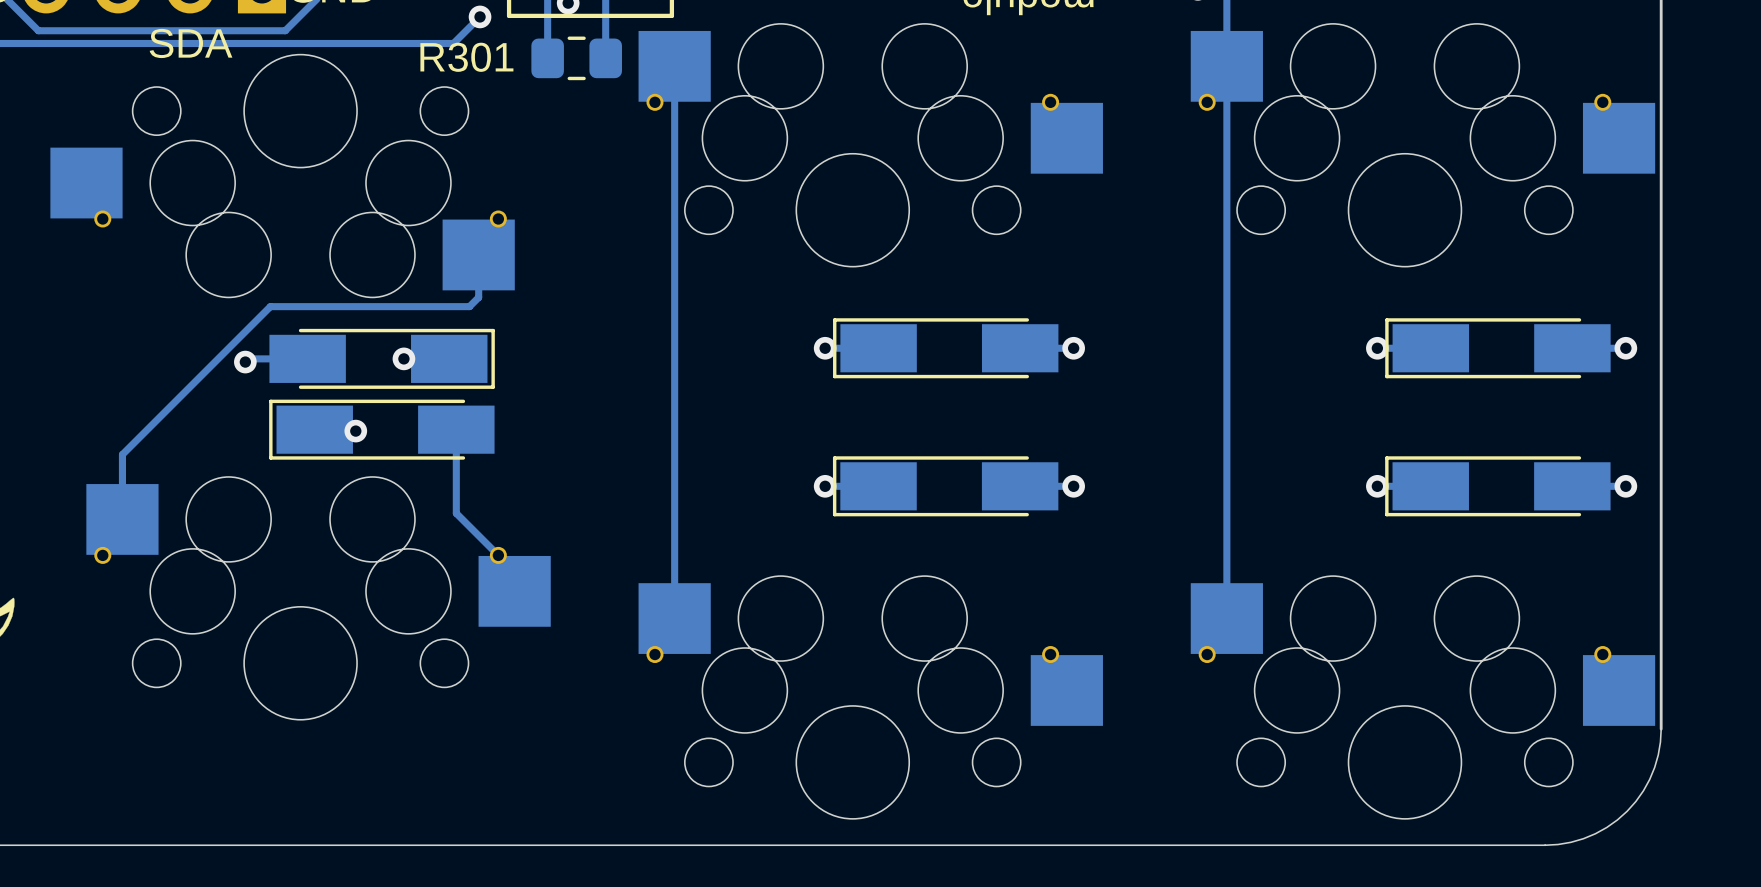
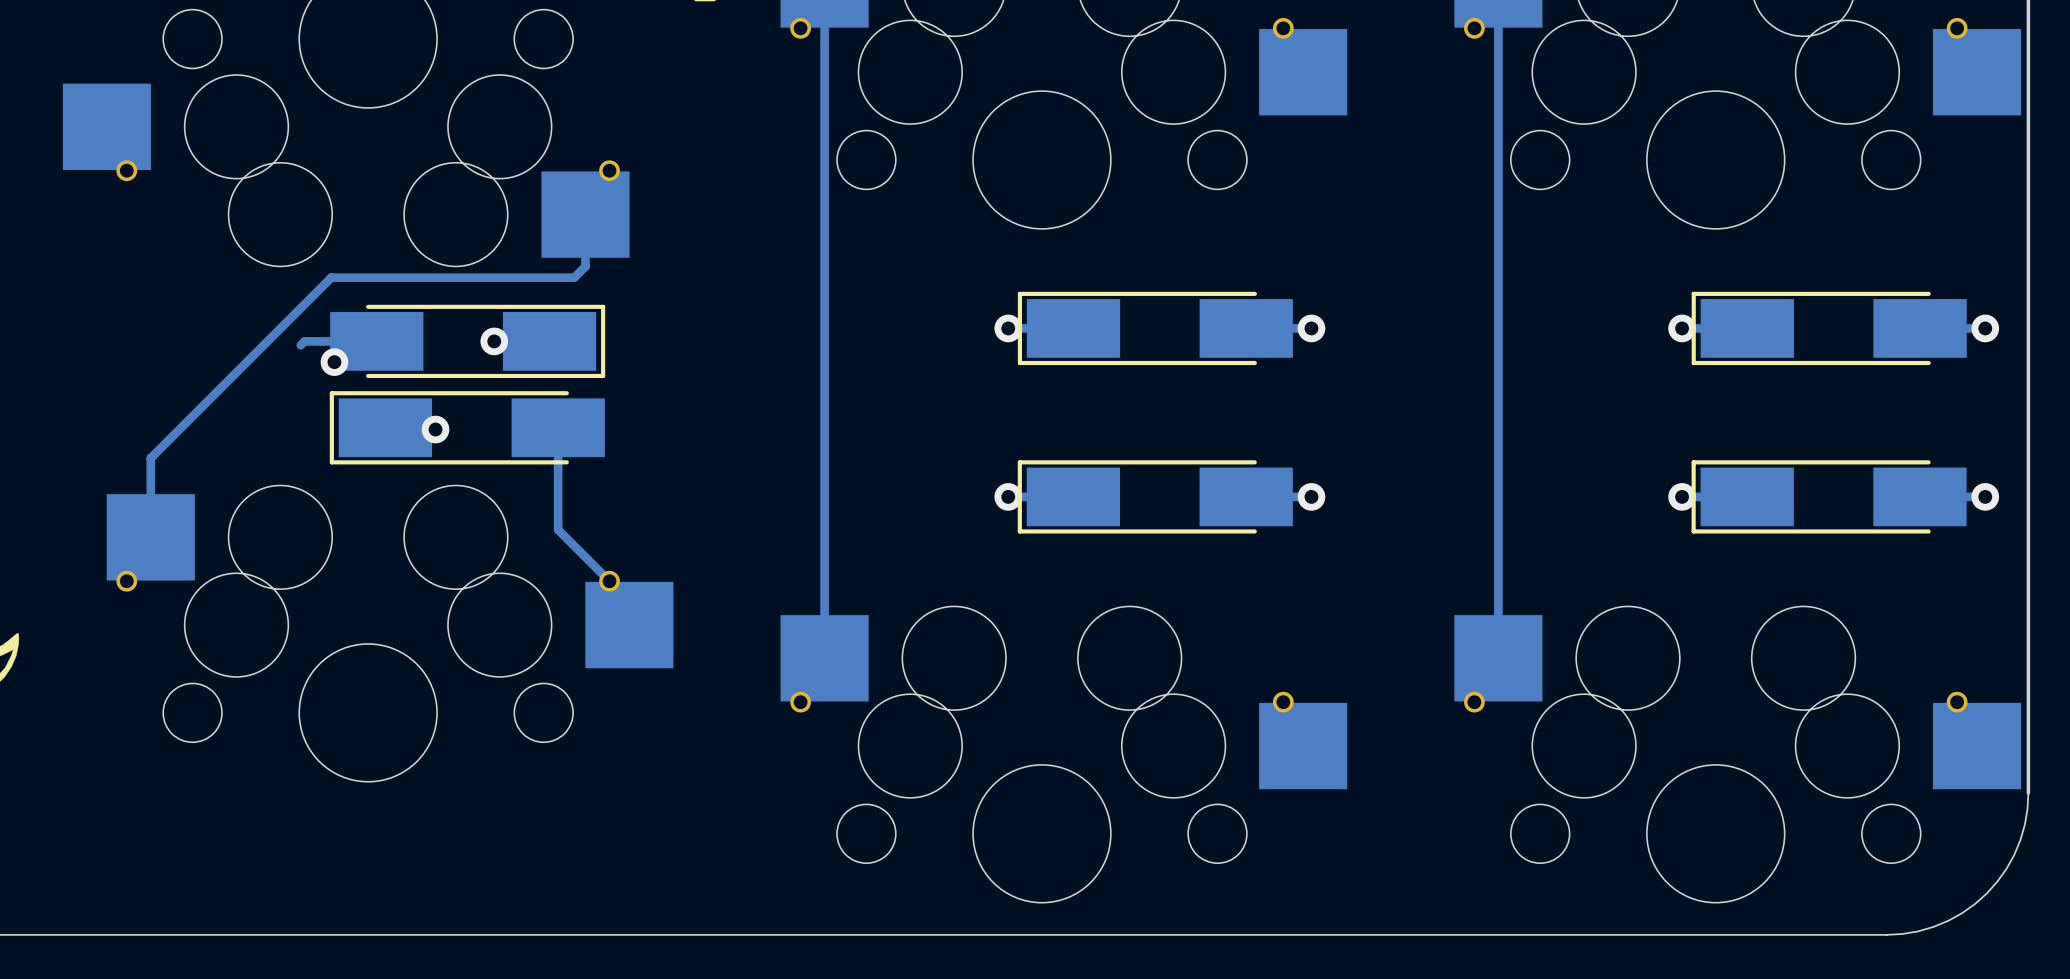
via position: (245, 362) -> (334, 362)

